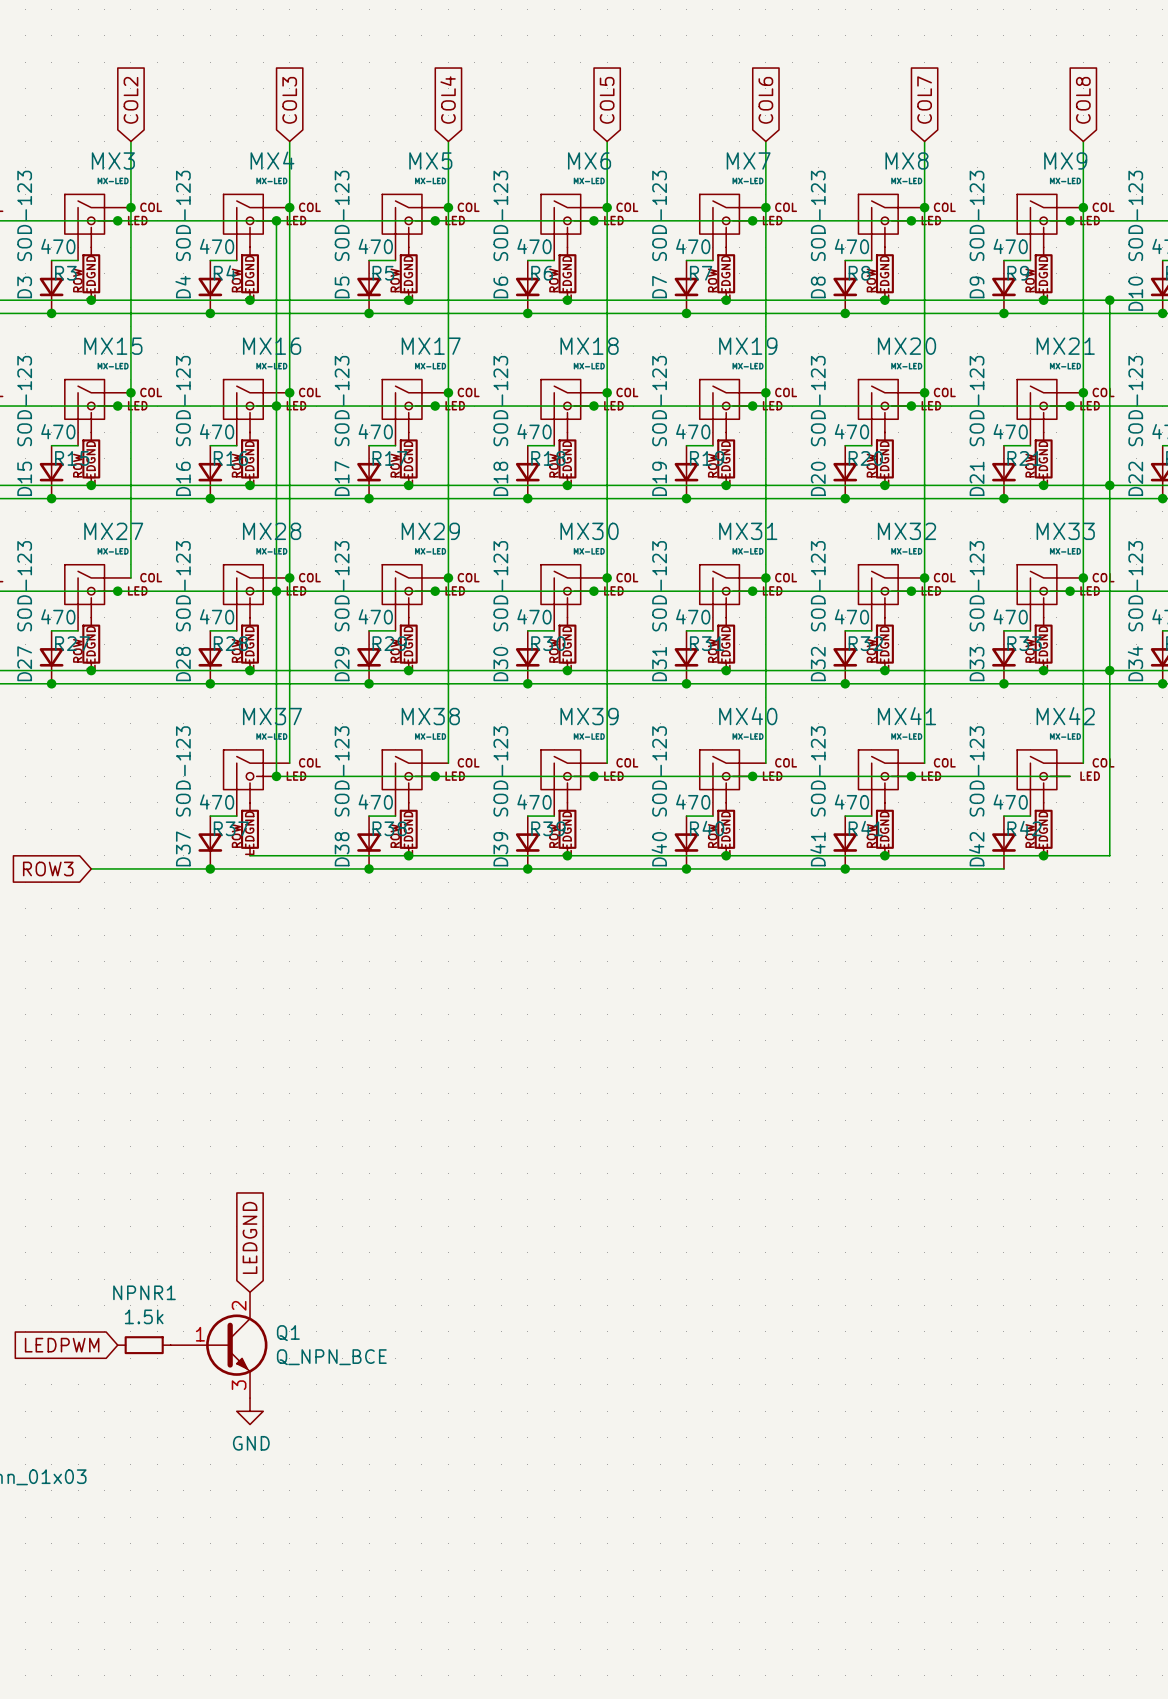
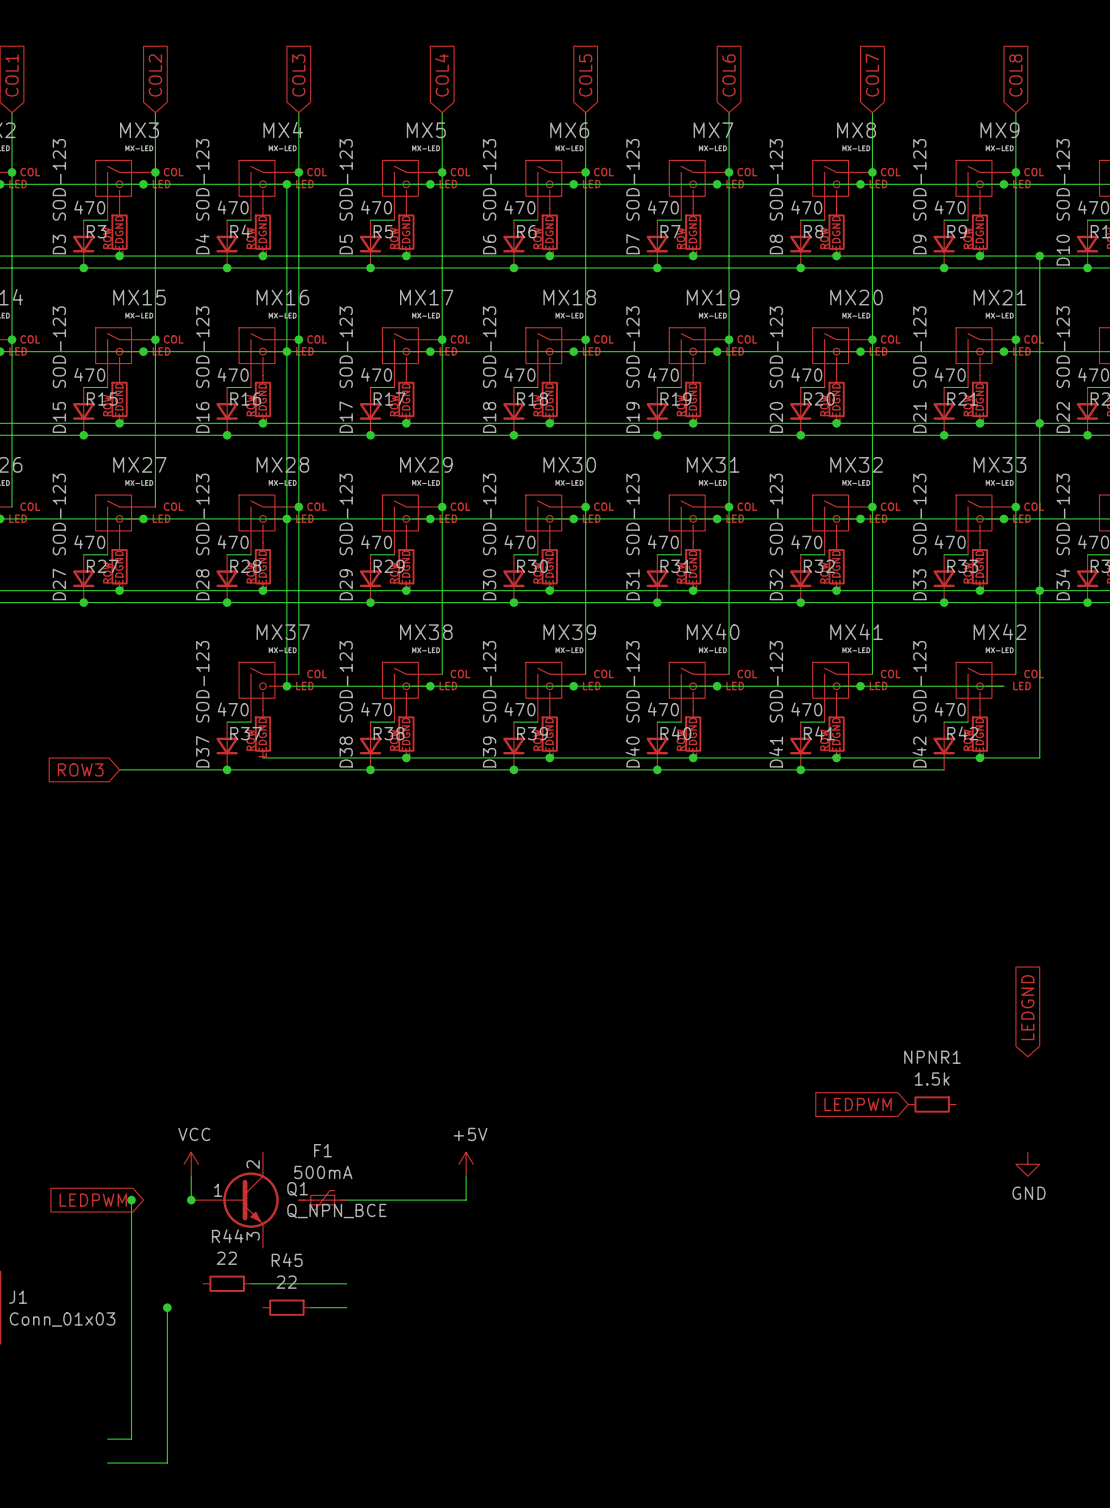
global label: none -> LEDGND (1027, 1007)
global label: LEDGND (250, 1237) -> none
global label: none -> LEDPWM (858, 1104)
power symbol: none -> VCC (191, 1164)
power symbol: none -> +5V (466, 1164)
power symbol: none -> GND (1027, 1164)
wire: none -> (191, 1176) (191, 1200)
wire: none -> (466, 1176) (466, 1200) (346, 1200)
wire: none -> (131, 1200) (131, 1439) (107, 1439)
junction: none -> (131, 1200)
NPNR1 position: (144, 1345) -> (932, 1104)
junction: none -> (191, 1200)
F1: none -> 500mA (322, 1200)
power symbol: GND (250, 1411) -> none
R44: none -> 22 (227, 1283)
wire: none -> (251, 1283) (346, 1283)
wire: none -> (167, 1307) (167, 1463) (107, 1463)
junction: none -> (167, 1307)
R45: none -> 22 (286, 1307)
wire: none -> (310, 1307) (346, 1307)

